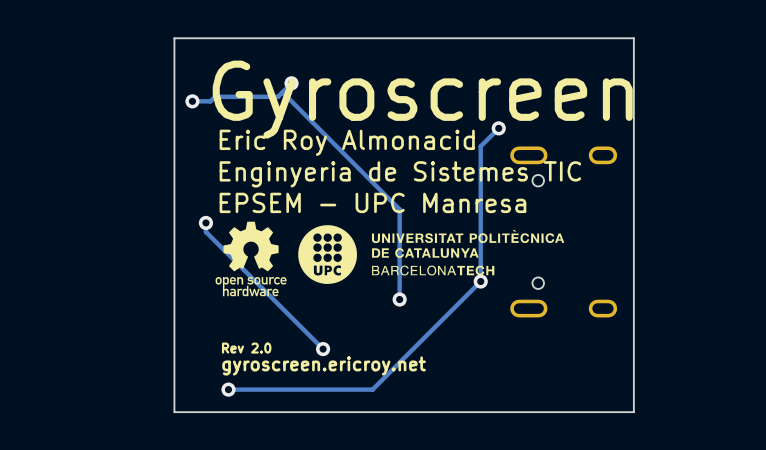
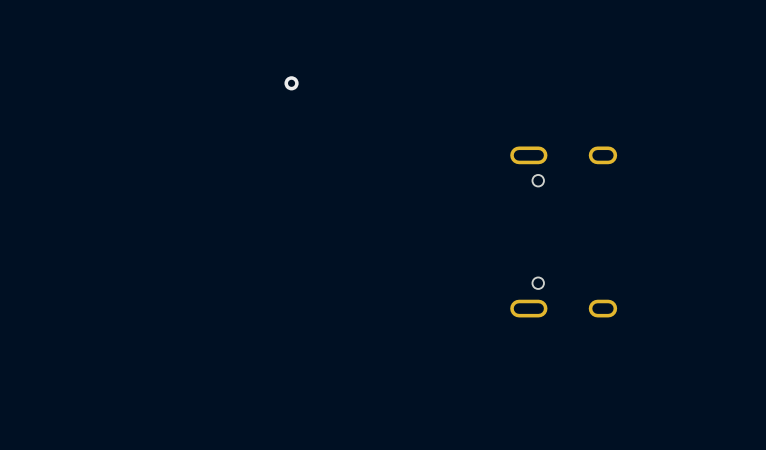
board edge: (633, 38) (174, 38) (174, 412) (633, 412) (633, 38) -> none
track: (291, 83) (278, 96) (214, 96) (210, 101) (192, 101) -> none
track: (282, 92) (399, 209) (399, 299) -> none
text: Gyroscreen (422, 99) -> none
via: (192, 101) -> none
track: (498, 128) (480, 146) (480, 281) (372, 389) (228, 389) -> none
via: (498, 128) -> none
text: Eric Roy Almonacid (347, 142) -> none
text: Enginyeria de Sistemes TIC (400, 174) -> none
text: EPSEM - UPC Manresa (372, 202) -> none
drawing: [215, 221, 565, 297] -> none
track: (205, 222) (205, 231) (323, 349) -> none
via: (205, 222) -> none
via: (480, 281) -> none
via: (399, 299) -> none
text: Rev 2.0 (246, 348) -> none
via: (323, 349) -> none
text: gyroscreen.ericroy.net (324, 365) -> none
via: (228, 389) -> none

